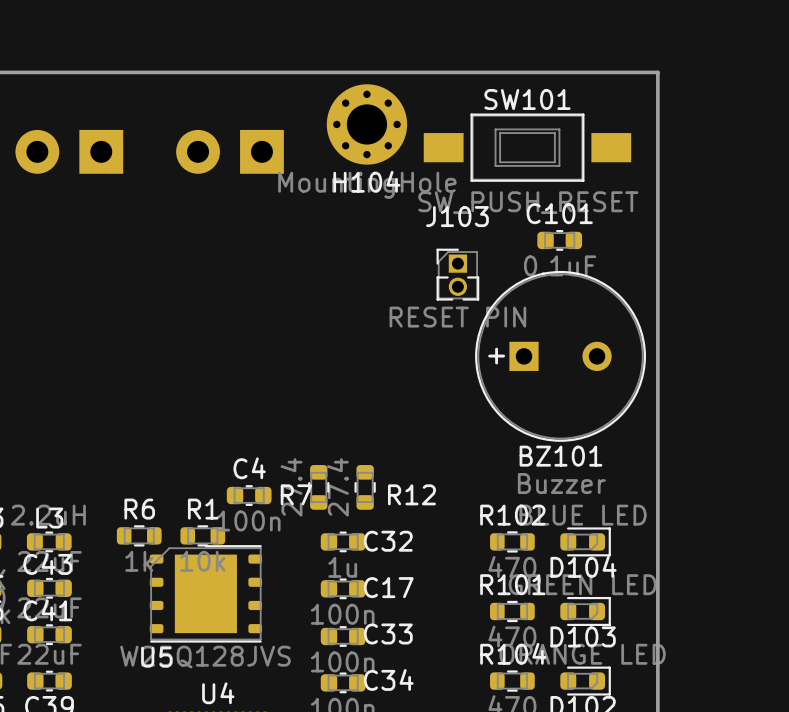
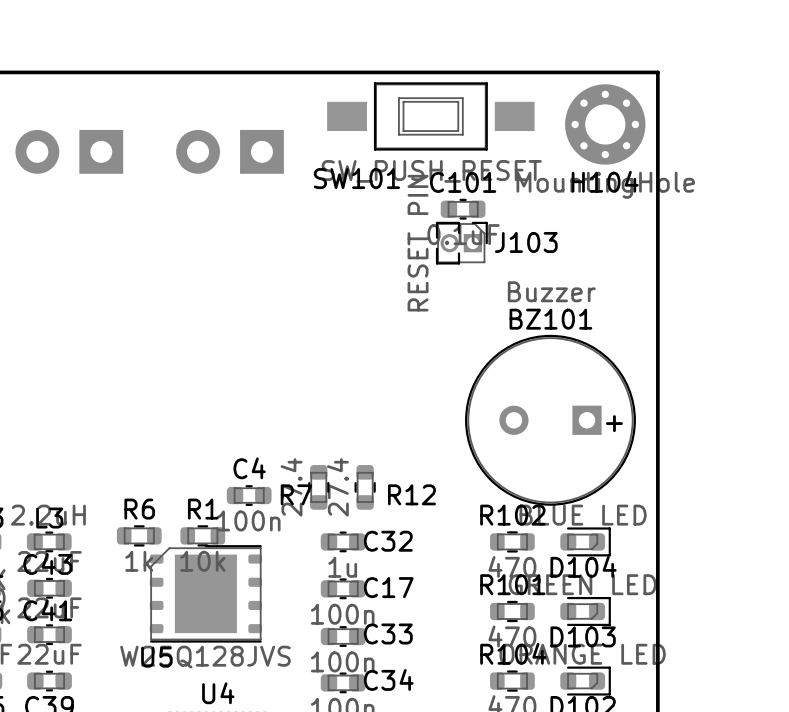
SW101 name position: SW101 (527, 99) -> SW101 (356, 178)
H104 position: (366, 124) -> (605, 124)
SW101 position: (527, 147) -> (430, 116)
C101 position: (559, 240) -> (463, 209)
J103 rotation: 0° (457, 274) -> 90° clockwise (461, 243)
J103 position: (457, 274) -> (461, 243)
BZ101 rotation: 0° (560, 356) -> 180° (550, 420)

